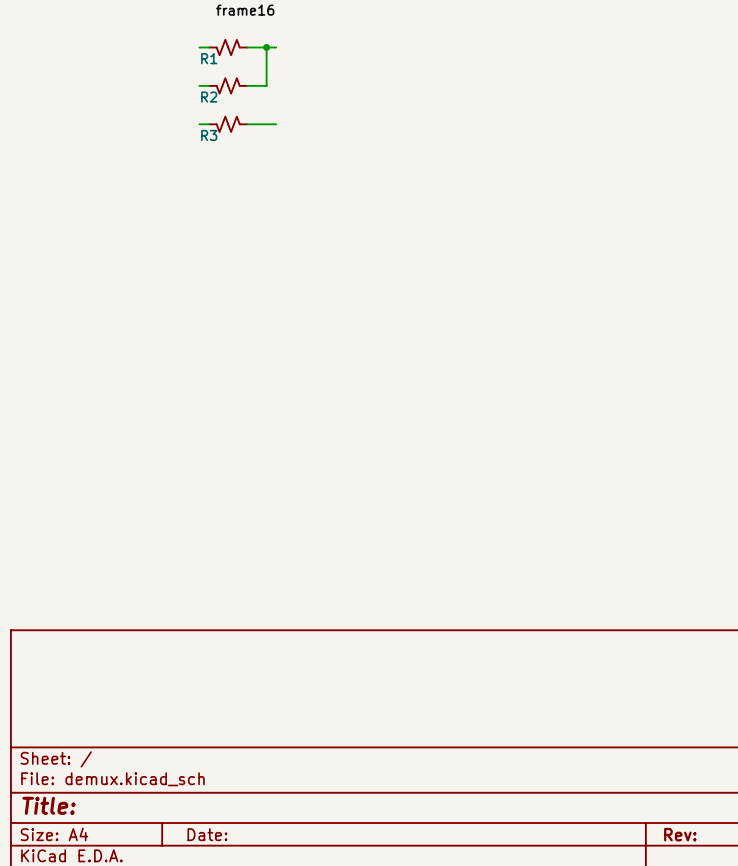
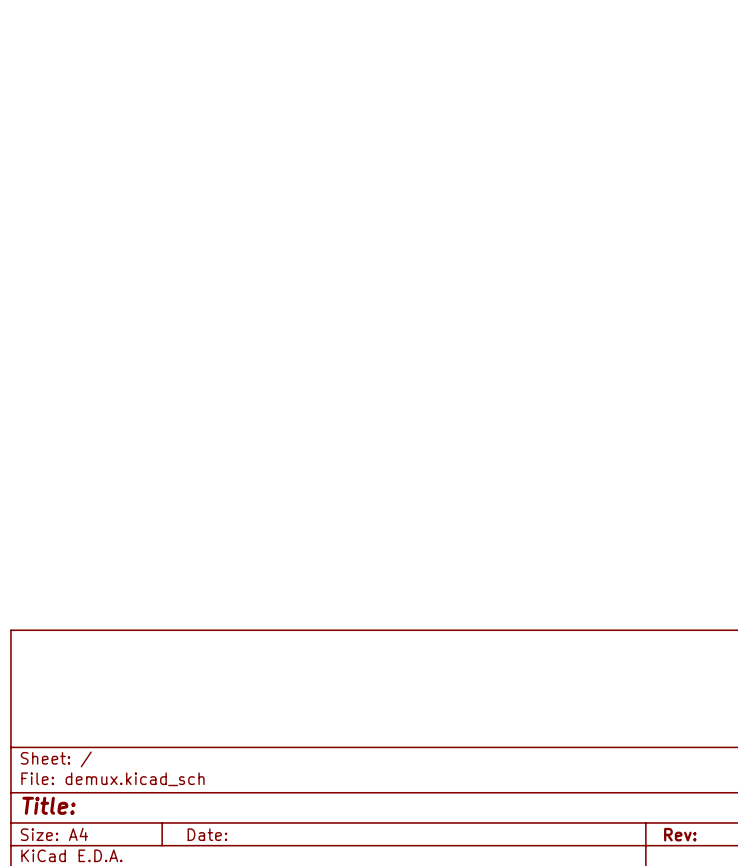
label: frame16 (245, 10) -> none
wire: (199, 47) (209, 47) -> none
R1: (228, 47) -> none
wire: (247, 47) (276, 47) -> none
wire: (266, 47) (266, 85) (247, 85) -> none
junction: (266, 47) -> none
wire: (199, 85) (209, 85) -> none
R2: (228, 85) -> none
wire: (199, 124) (209, 124) -> none
R3: (228, 124) -> none
wire: (247, 124) (276, 124) -> none

